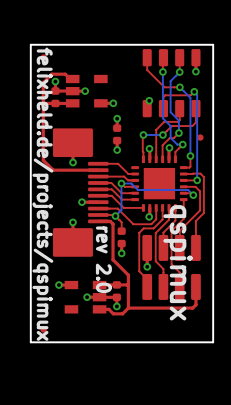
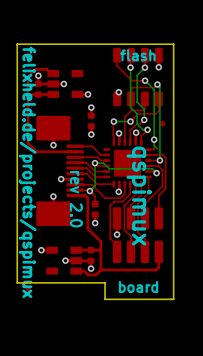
text: none -> flash (137, 55)
bottom track: none -> (154, 139) (154, 145) (157, 148)
text position: rev 2.0 (103, 259) -> rev 2.0 (76, 199)
text position: qspimux (178, 262) -> qspimux (139, 196)
board edge: (30, 323) (30, 342) (133, 342) -> (17, 282) (105, 282) (105, 299)
text: none -> board (138, 286)

